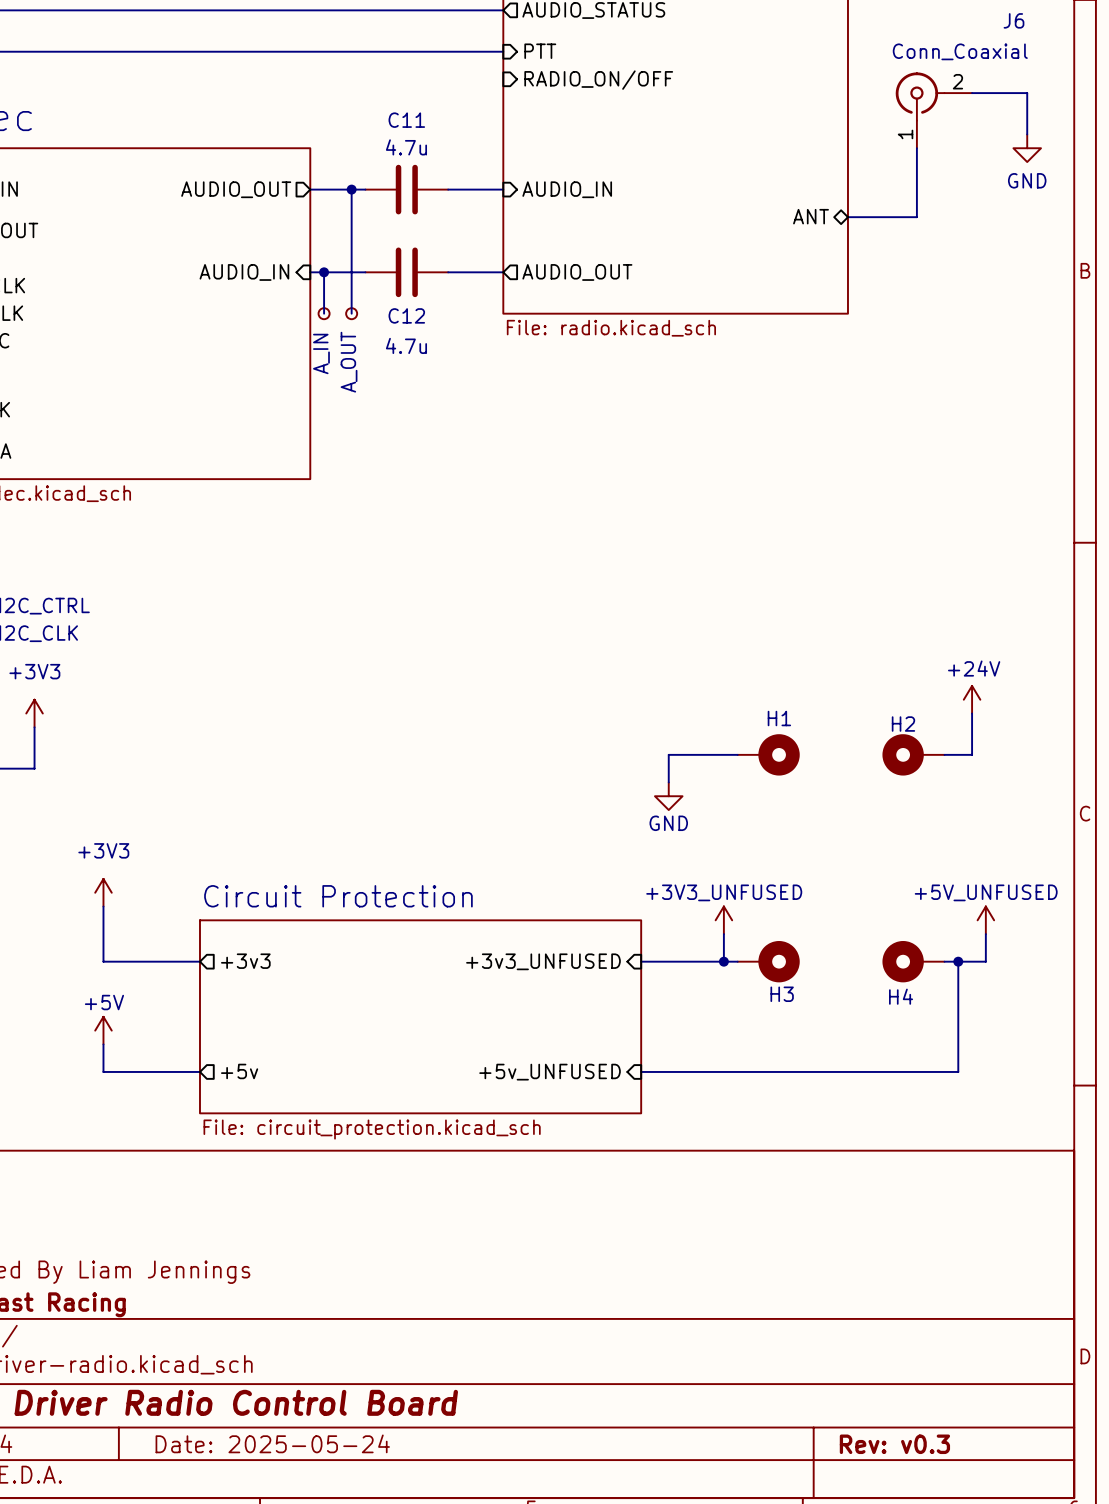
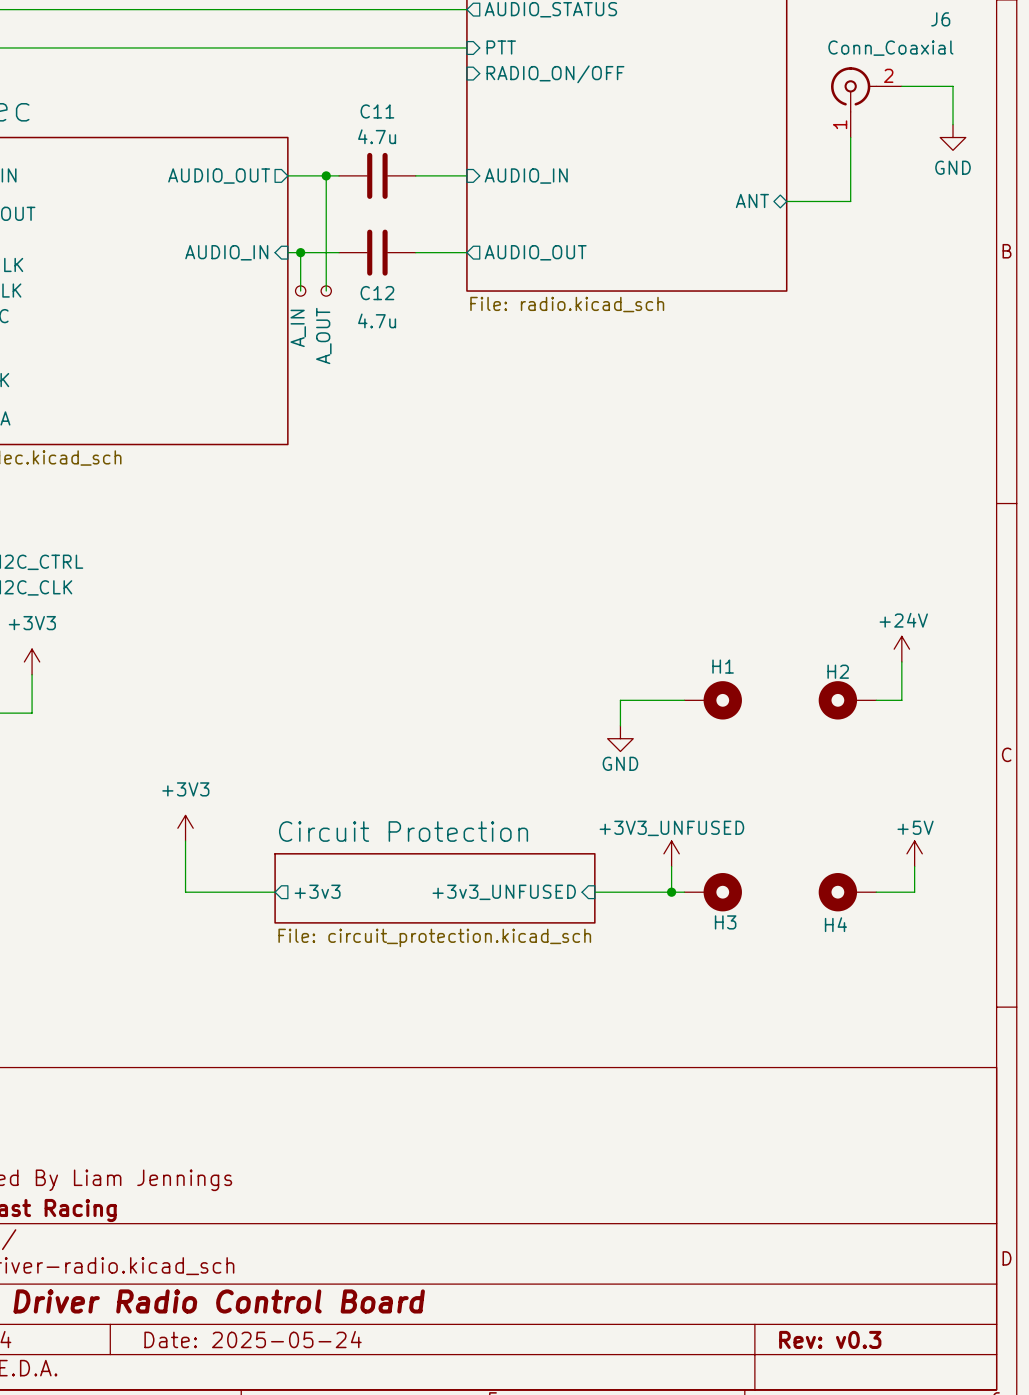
power symbol position: +3V3 (103, 892) -> +3V3 (185, 828)
wire: (103, 906) (103, 961) (199, 961) -> (185, 841) (185, 892) (275, 892)
power symbol: +5V_UNFUSED (985, 920) -> +5V (914, 853)
sheet Circuit Protection: none -> File: circuit_protection.kicad_sch (434, 888)
sheet pin position: +3v3 (245, 961) -> +3v3 (317, 891)
wire: (958, 961) (958, 1071) (641, 1071) -> none
junction: (958, 961) -> none
sheet Circuit Protection: File: circuit_protection.kicad_sch (420, 1016) -> none
power symbol: +5V (103, 1030) -> none
wire: (103, 1044) (103, 1071) (199, 1071) -> none
sheet pin: +5v (239, 1071) -> none
sheet pin: +5v_UNFUSED (550, 1072) -> none

